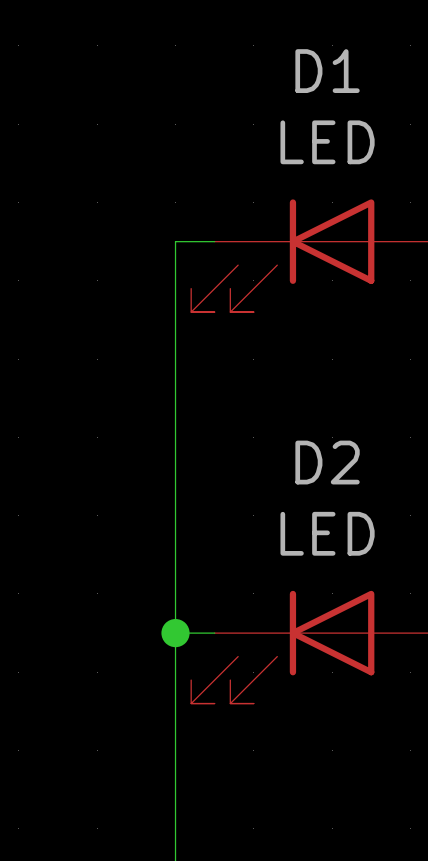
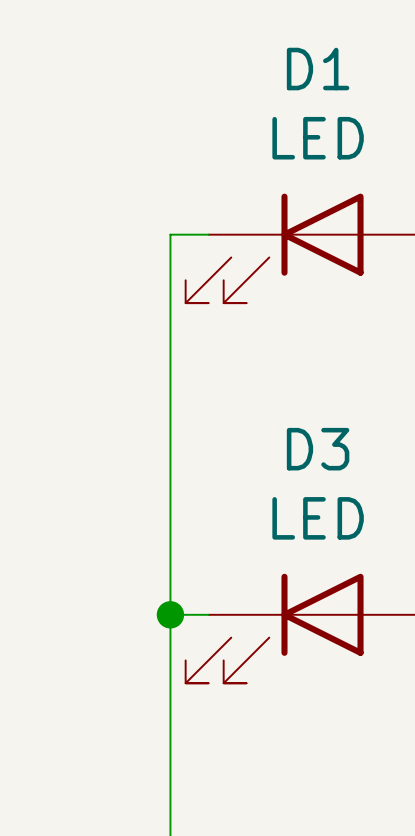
D2 name: D2 (327, 462) -> D3 (318, 449)

